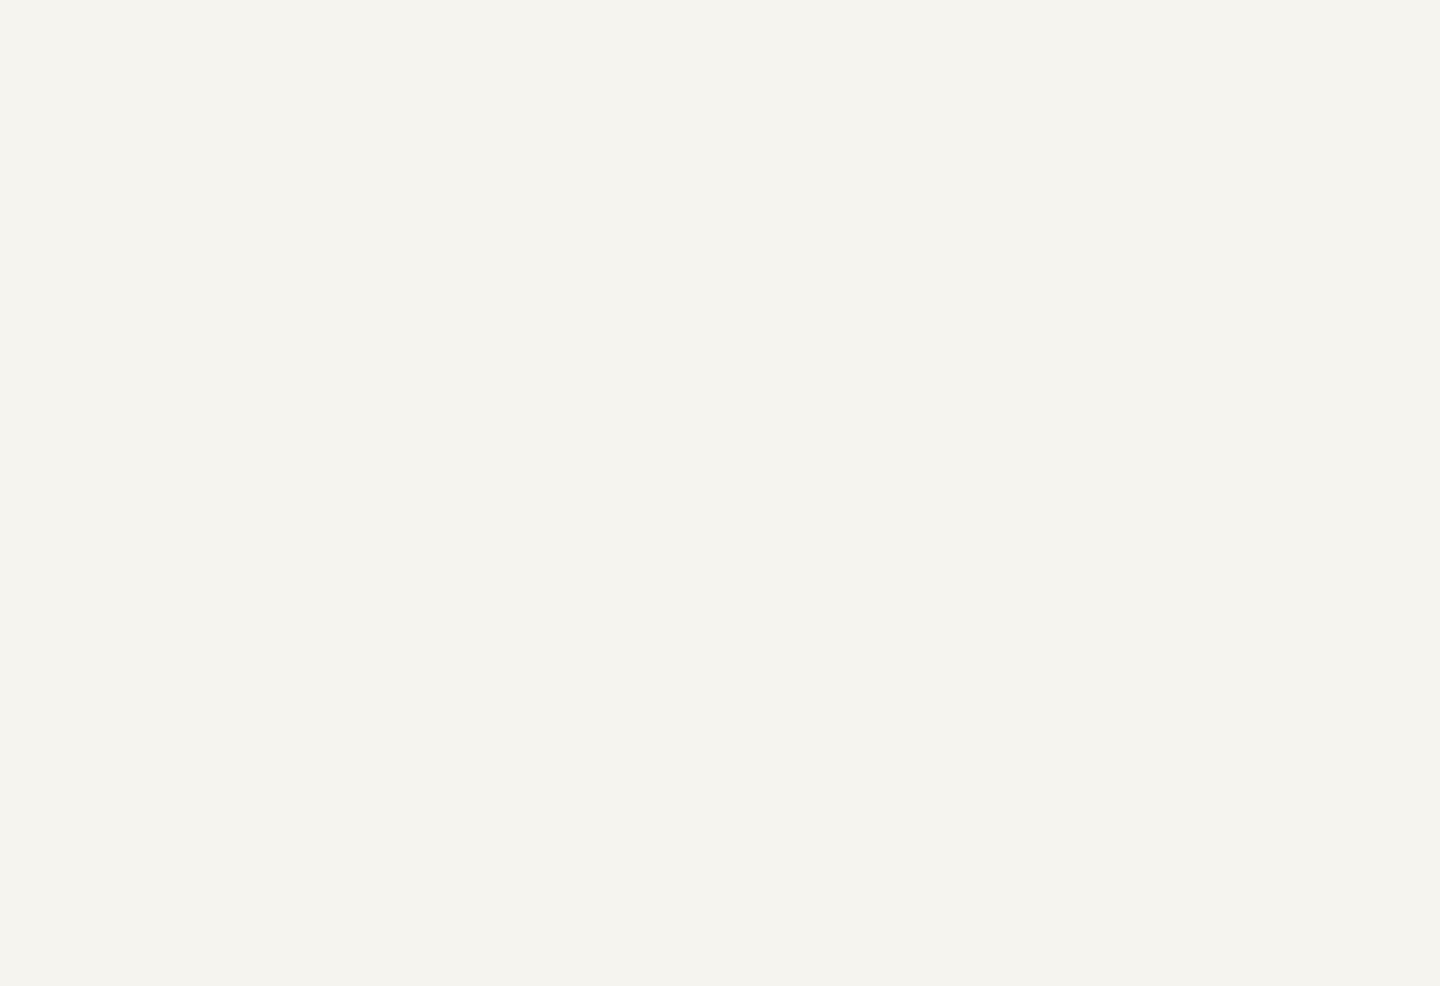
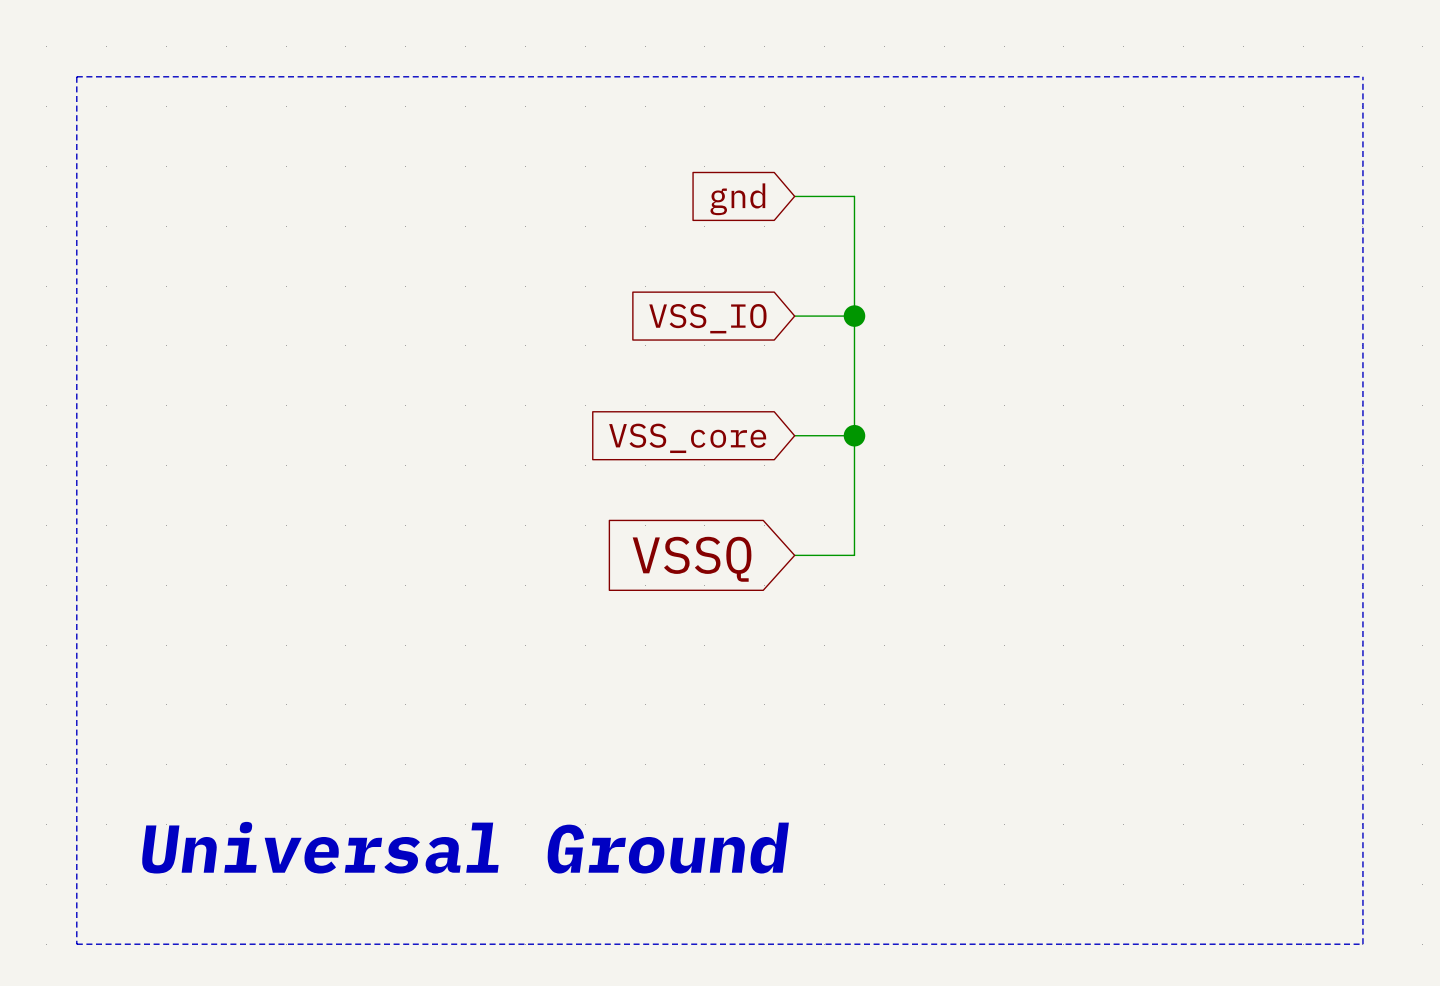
line: none -> (76, 76) (1362, 76) (1362, 944) (76, 944) (76, 76)
wire: none -> (794, 196) (854, 196) (854, 555) (794, 555)
global label: none -> gnd (737, 199)
wire: none -> (794, 316) (854, 316)
junction: none -> (854, 316)
global label: none -> VSS_IO (707, 318)
wire: none -> (794, 435) (854, 435)
junction: none -> (854, 435)
global label: none -> VSS_core (687, 438)
global label: none -> VSSQ (692, 559)
text: none -> Universal Ground (465, 847)

